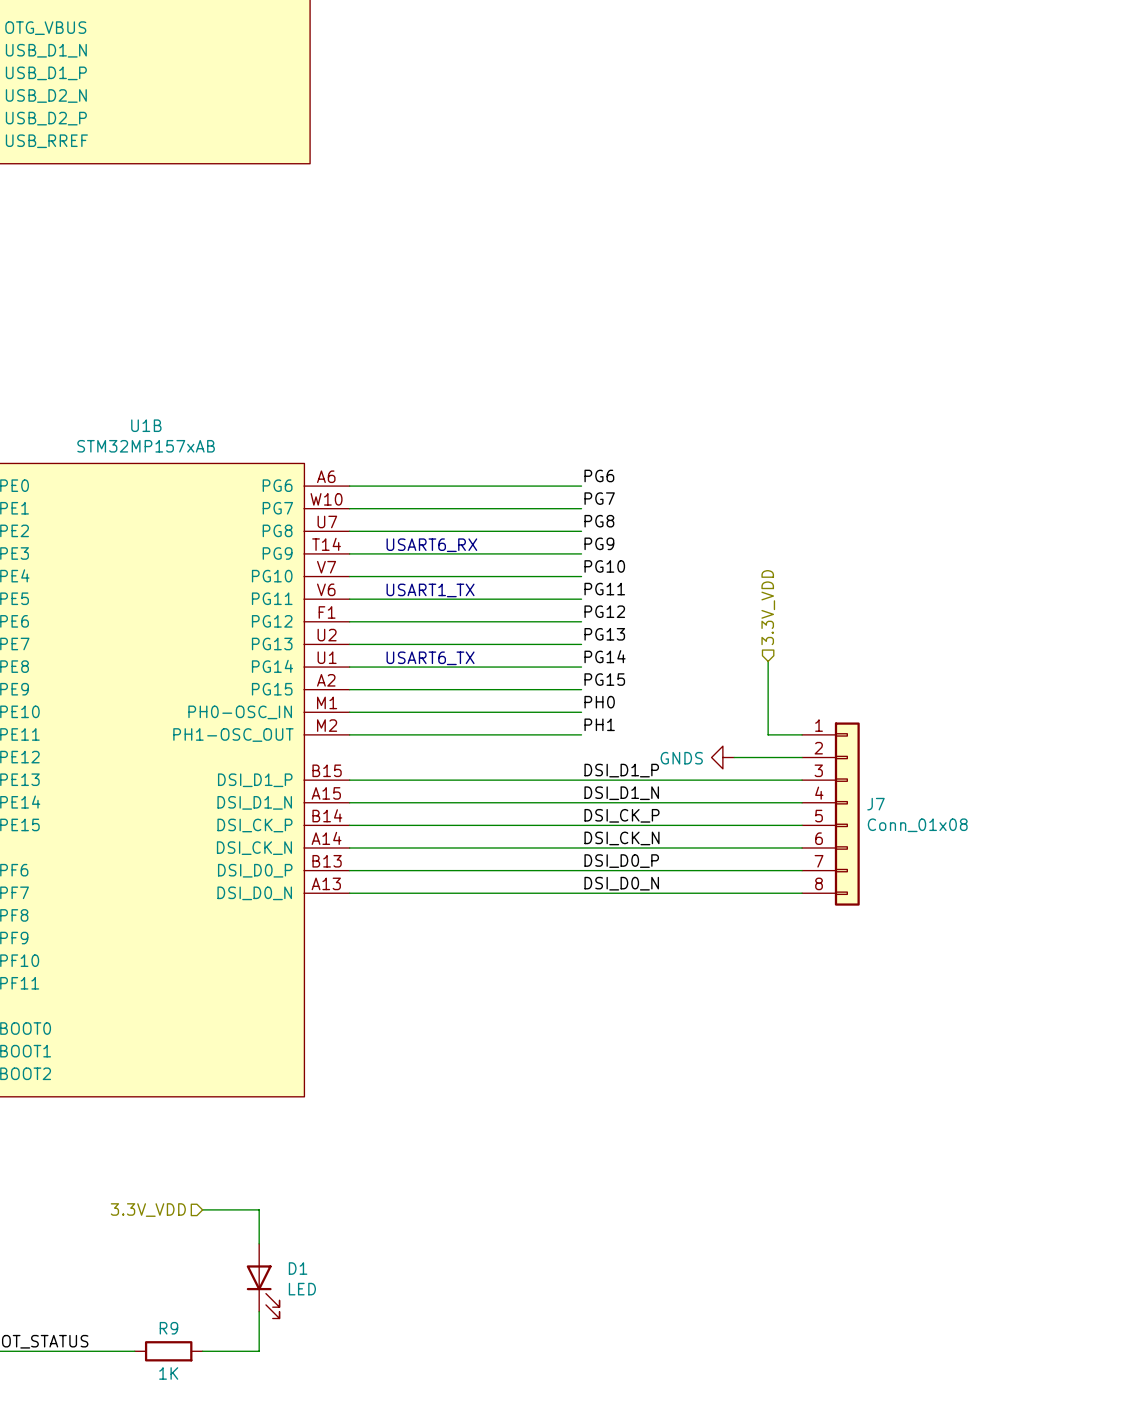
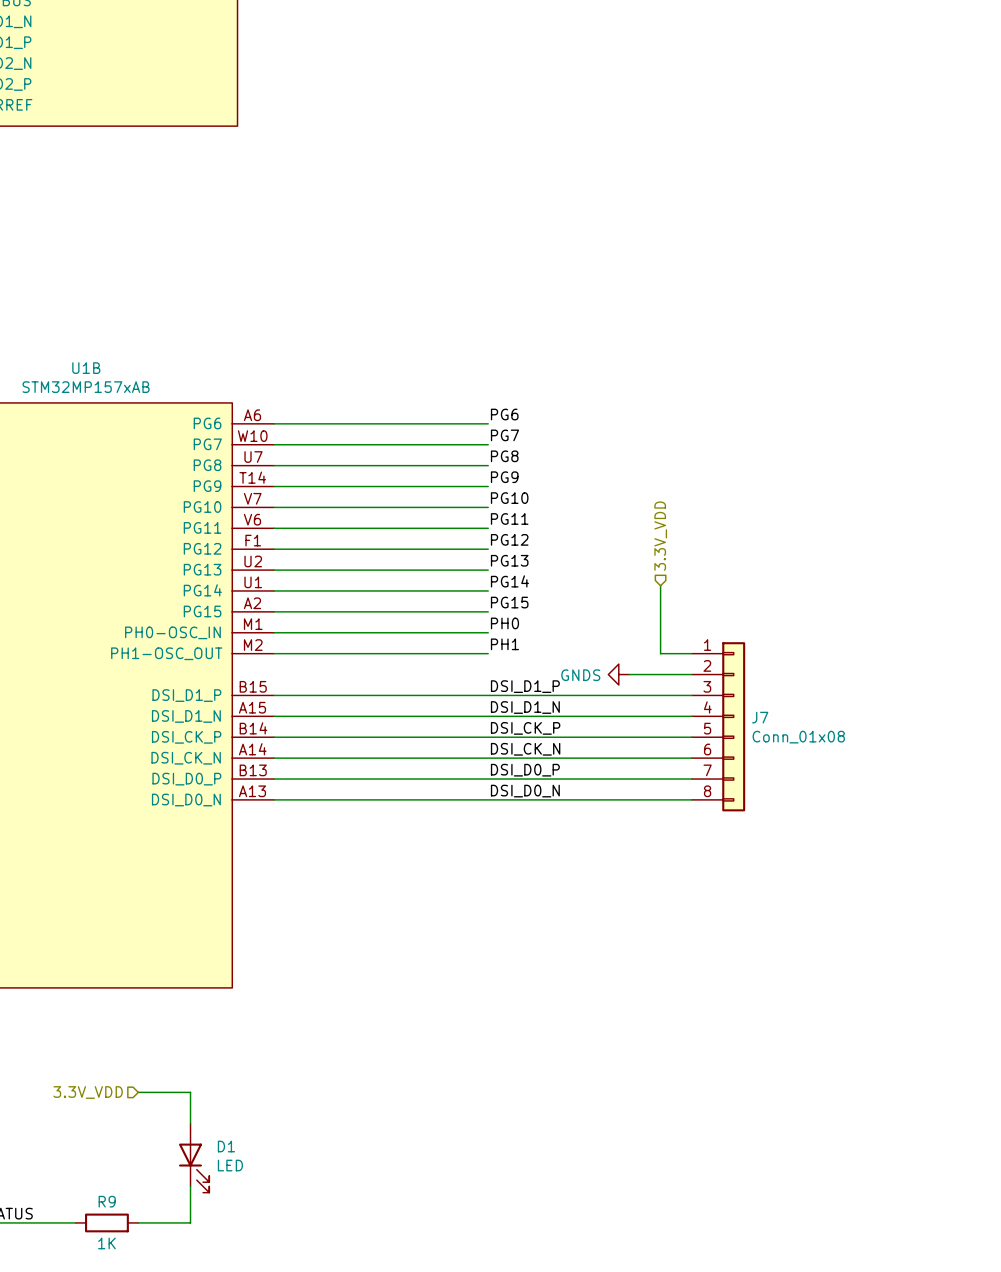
text: USART6_RX (431, 545) -> none
text: USART1_TX (430, 590) -> none
text: USART6_TX (430, 658) -> none

